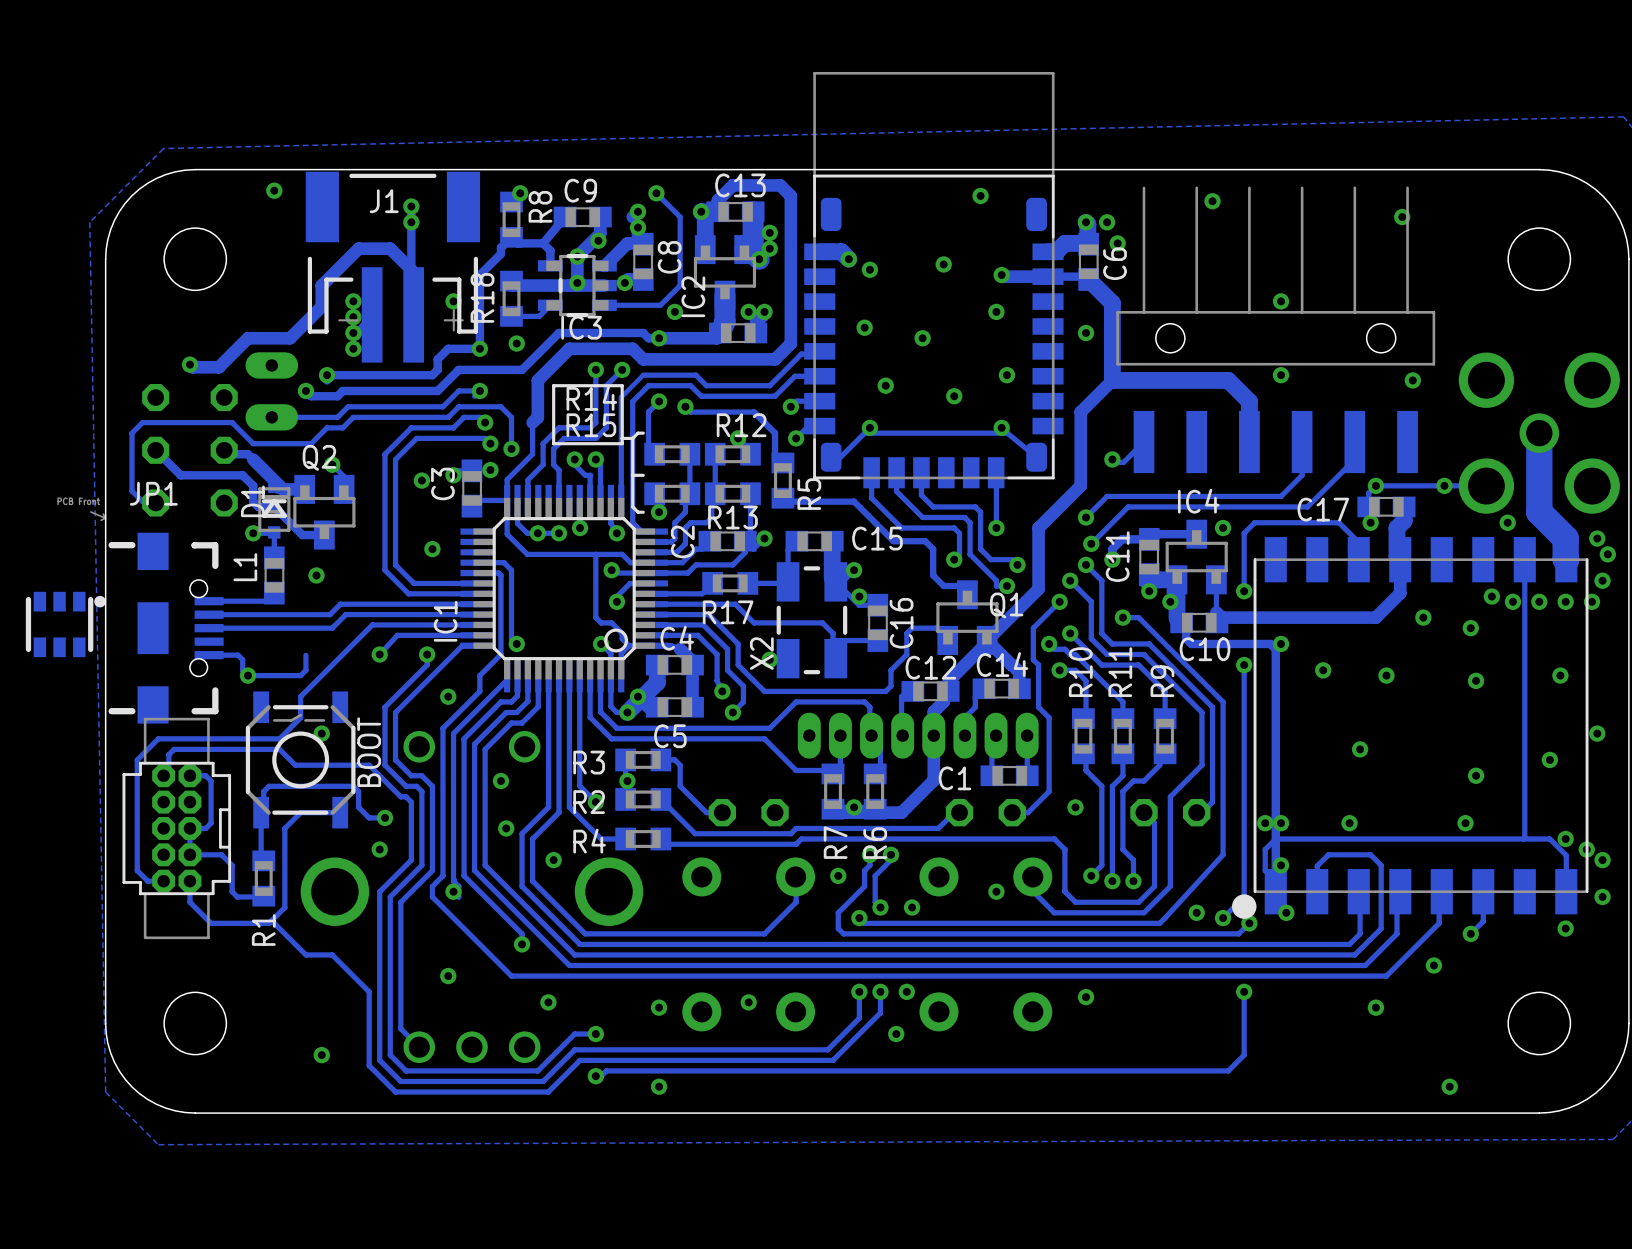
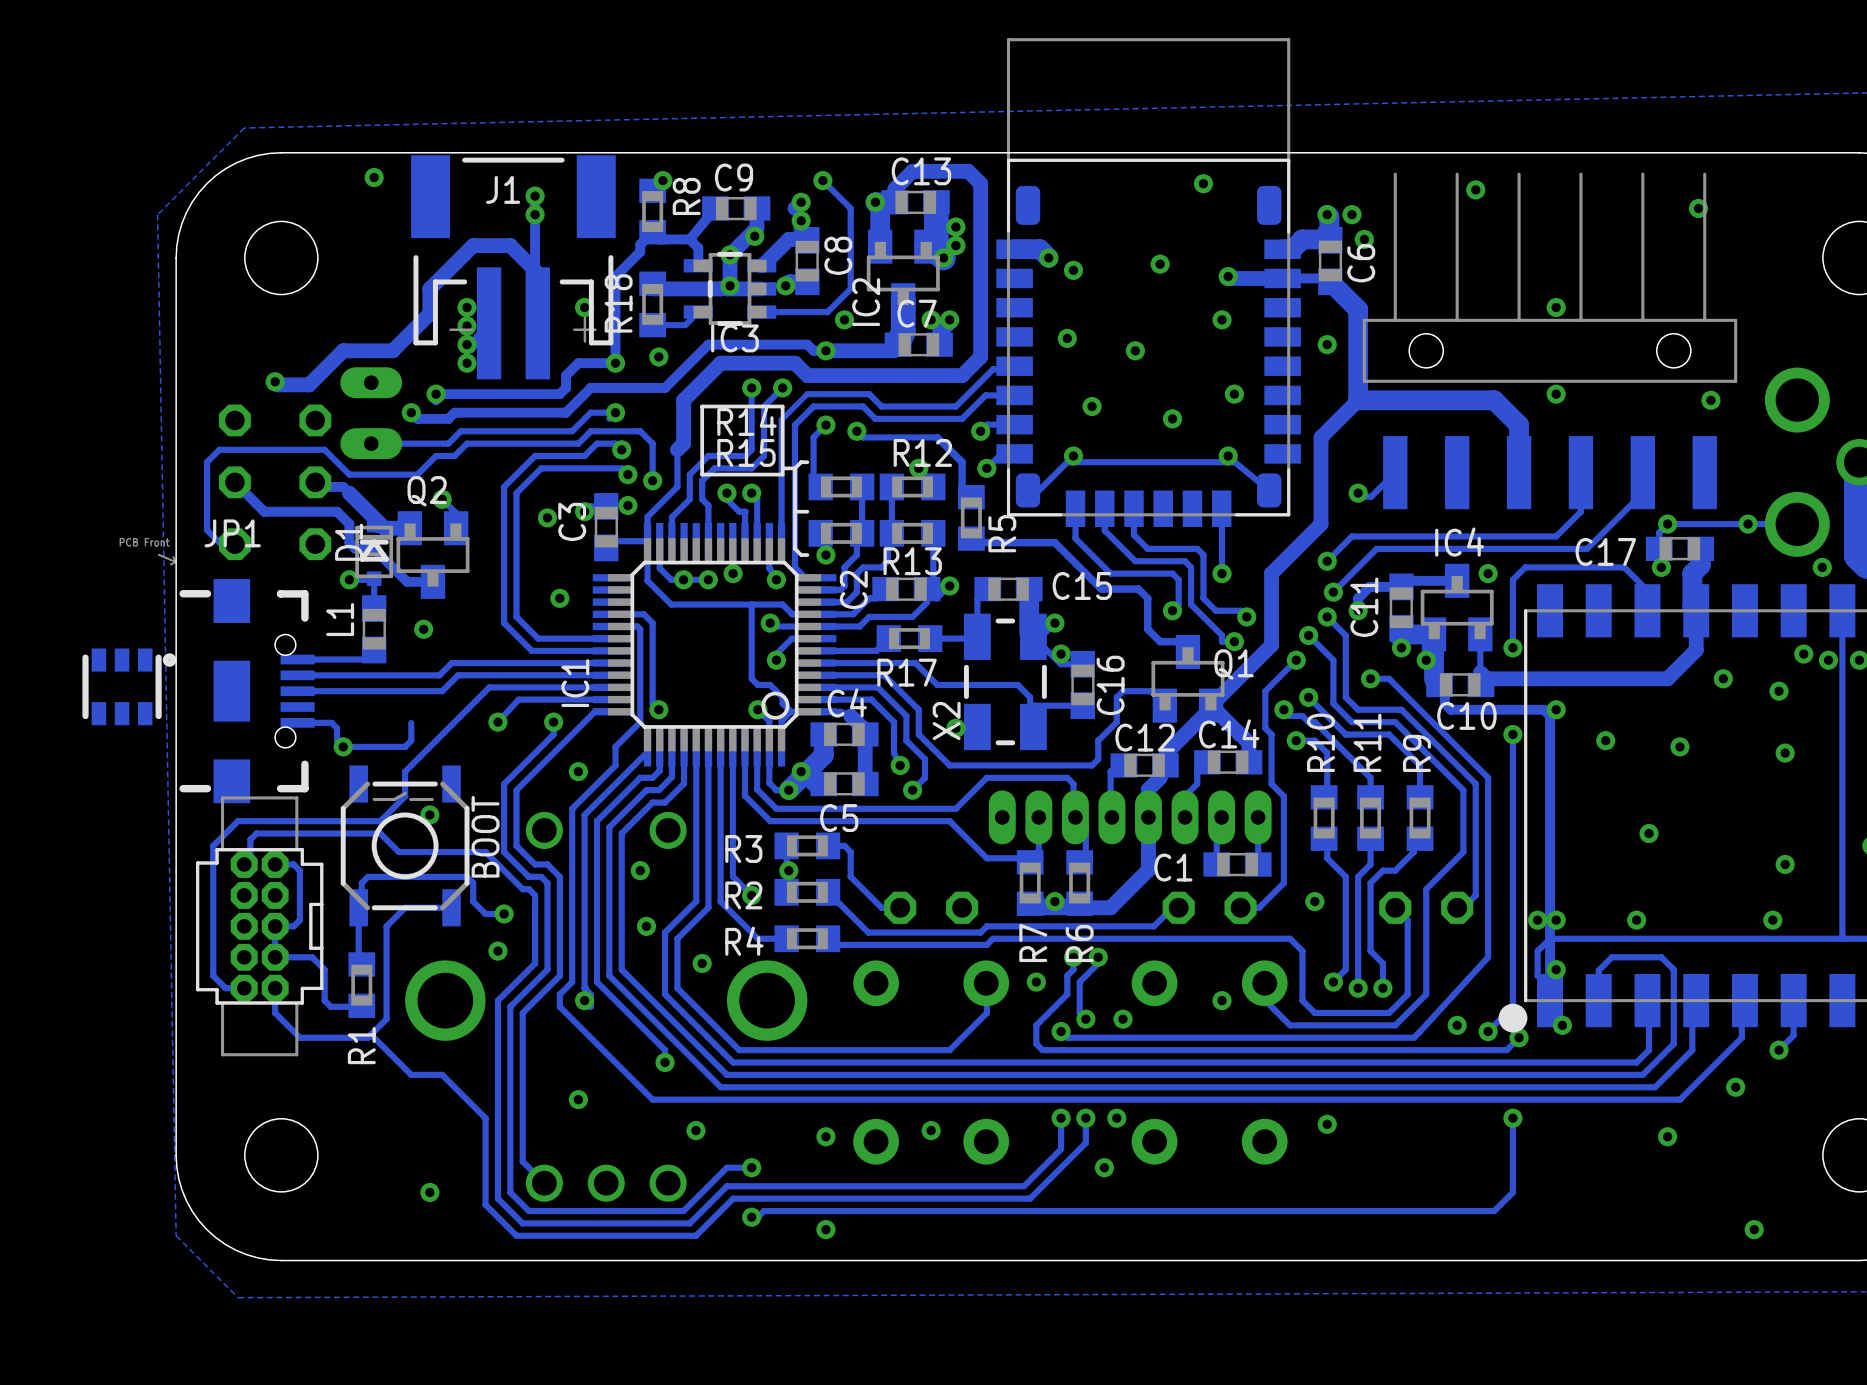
C7 name: none -> C7 (917, 313)

